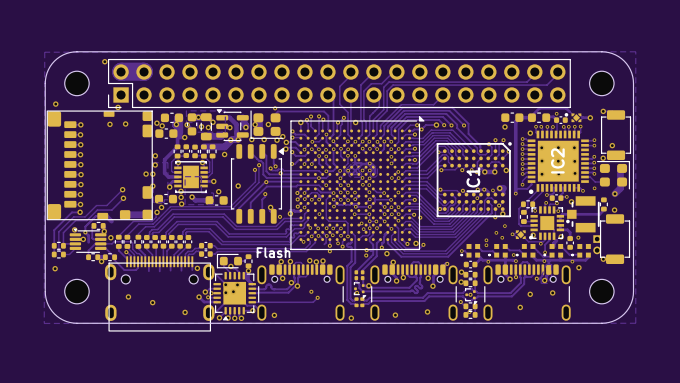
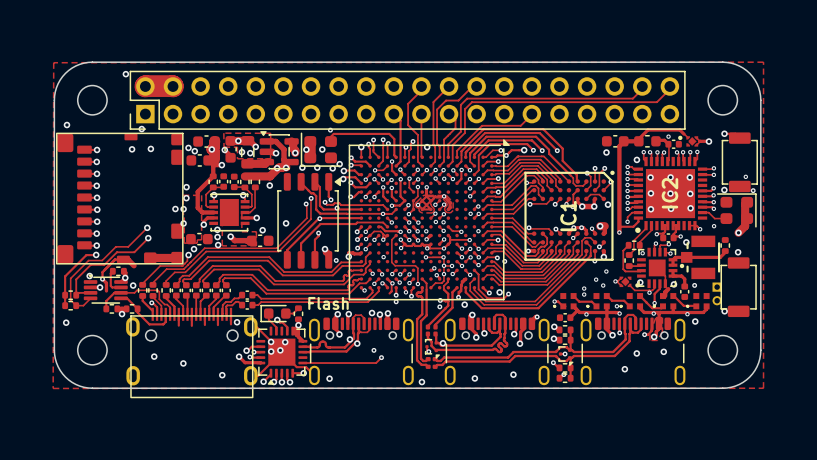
via: (612, 145) -> none
via: none -> (745, 176)
via: none -> (753, 190)

